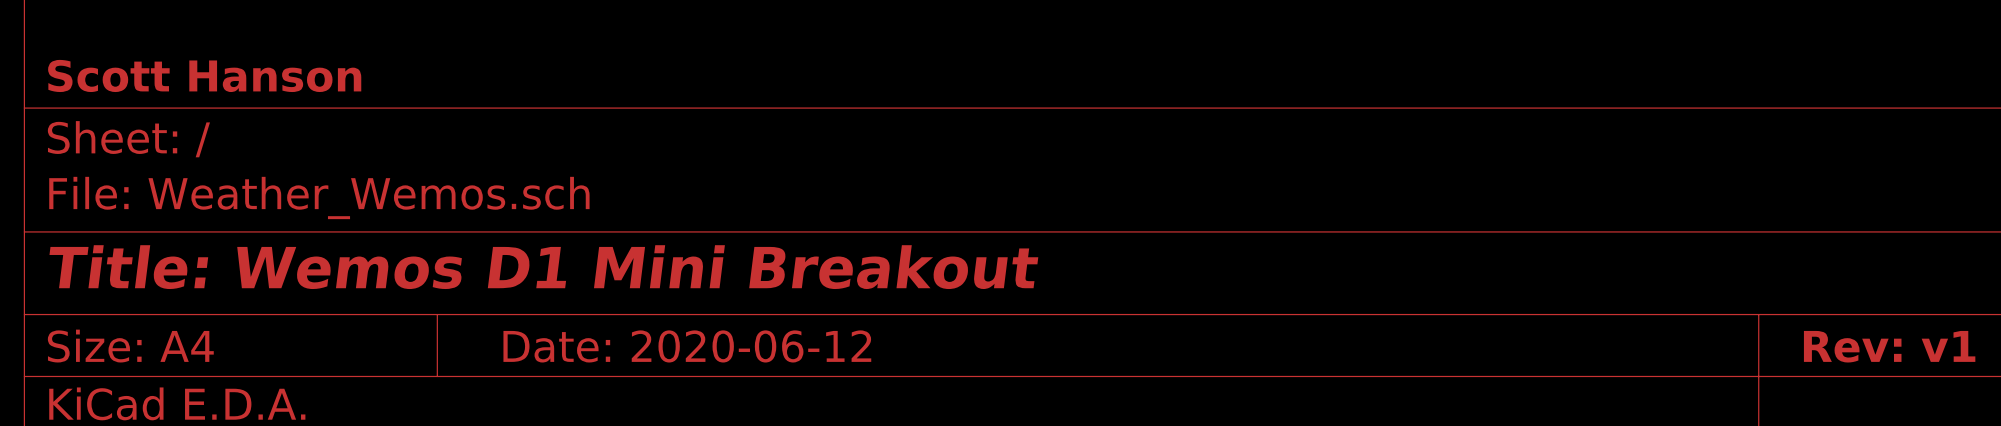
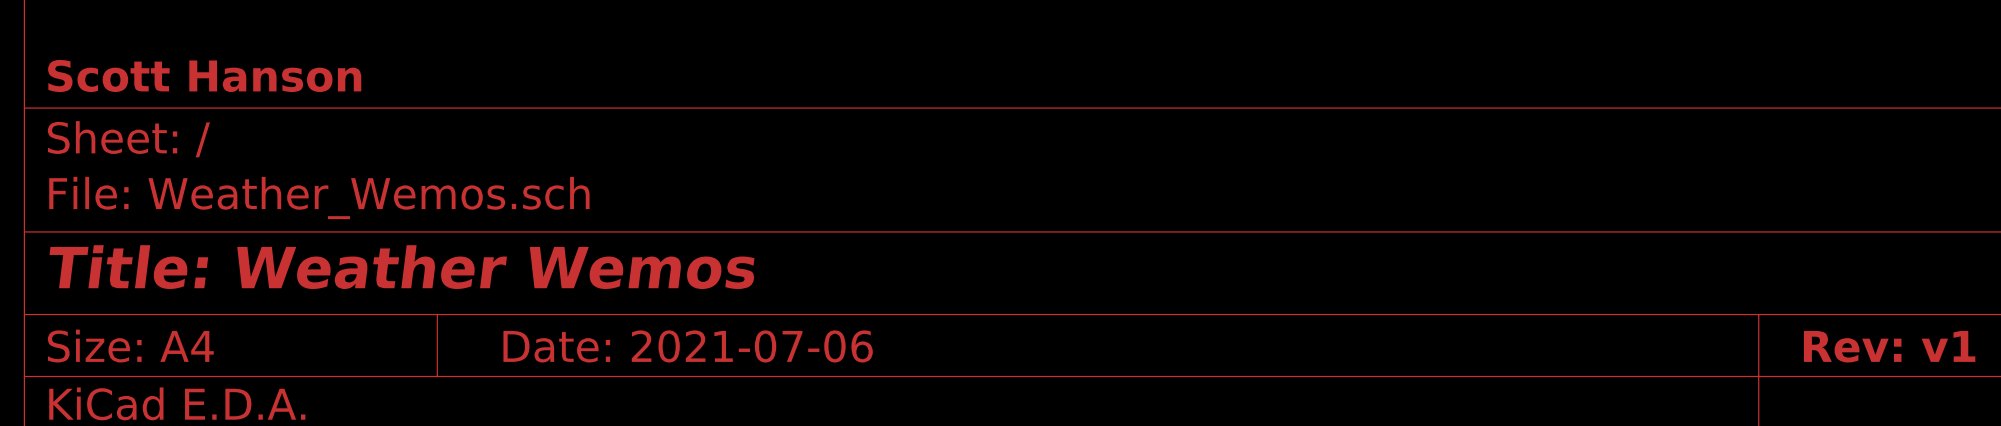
title block: Title: Wemos D1 Mini Breakout (543, 267) -> Title: Weather Wemos (402, 267)
title block: Date: 2020-06-12 (687, 346) -> Date: 2021-07-06 (688, 346)

